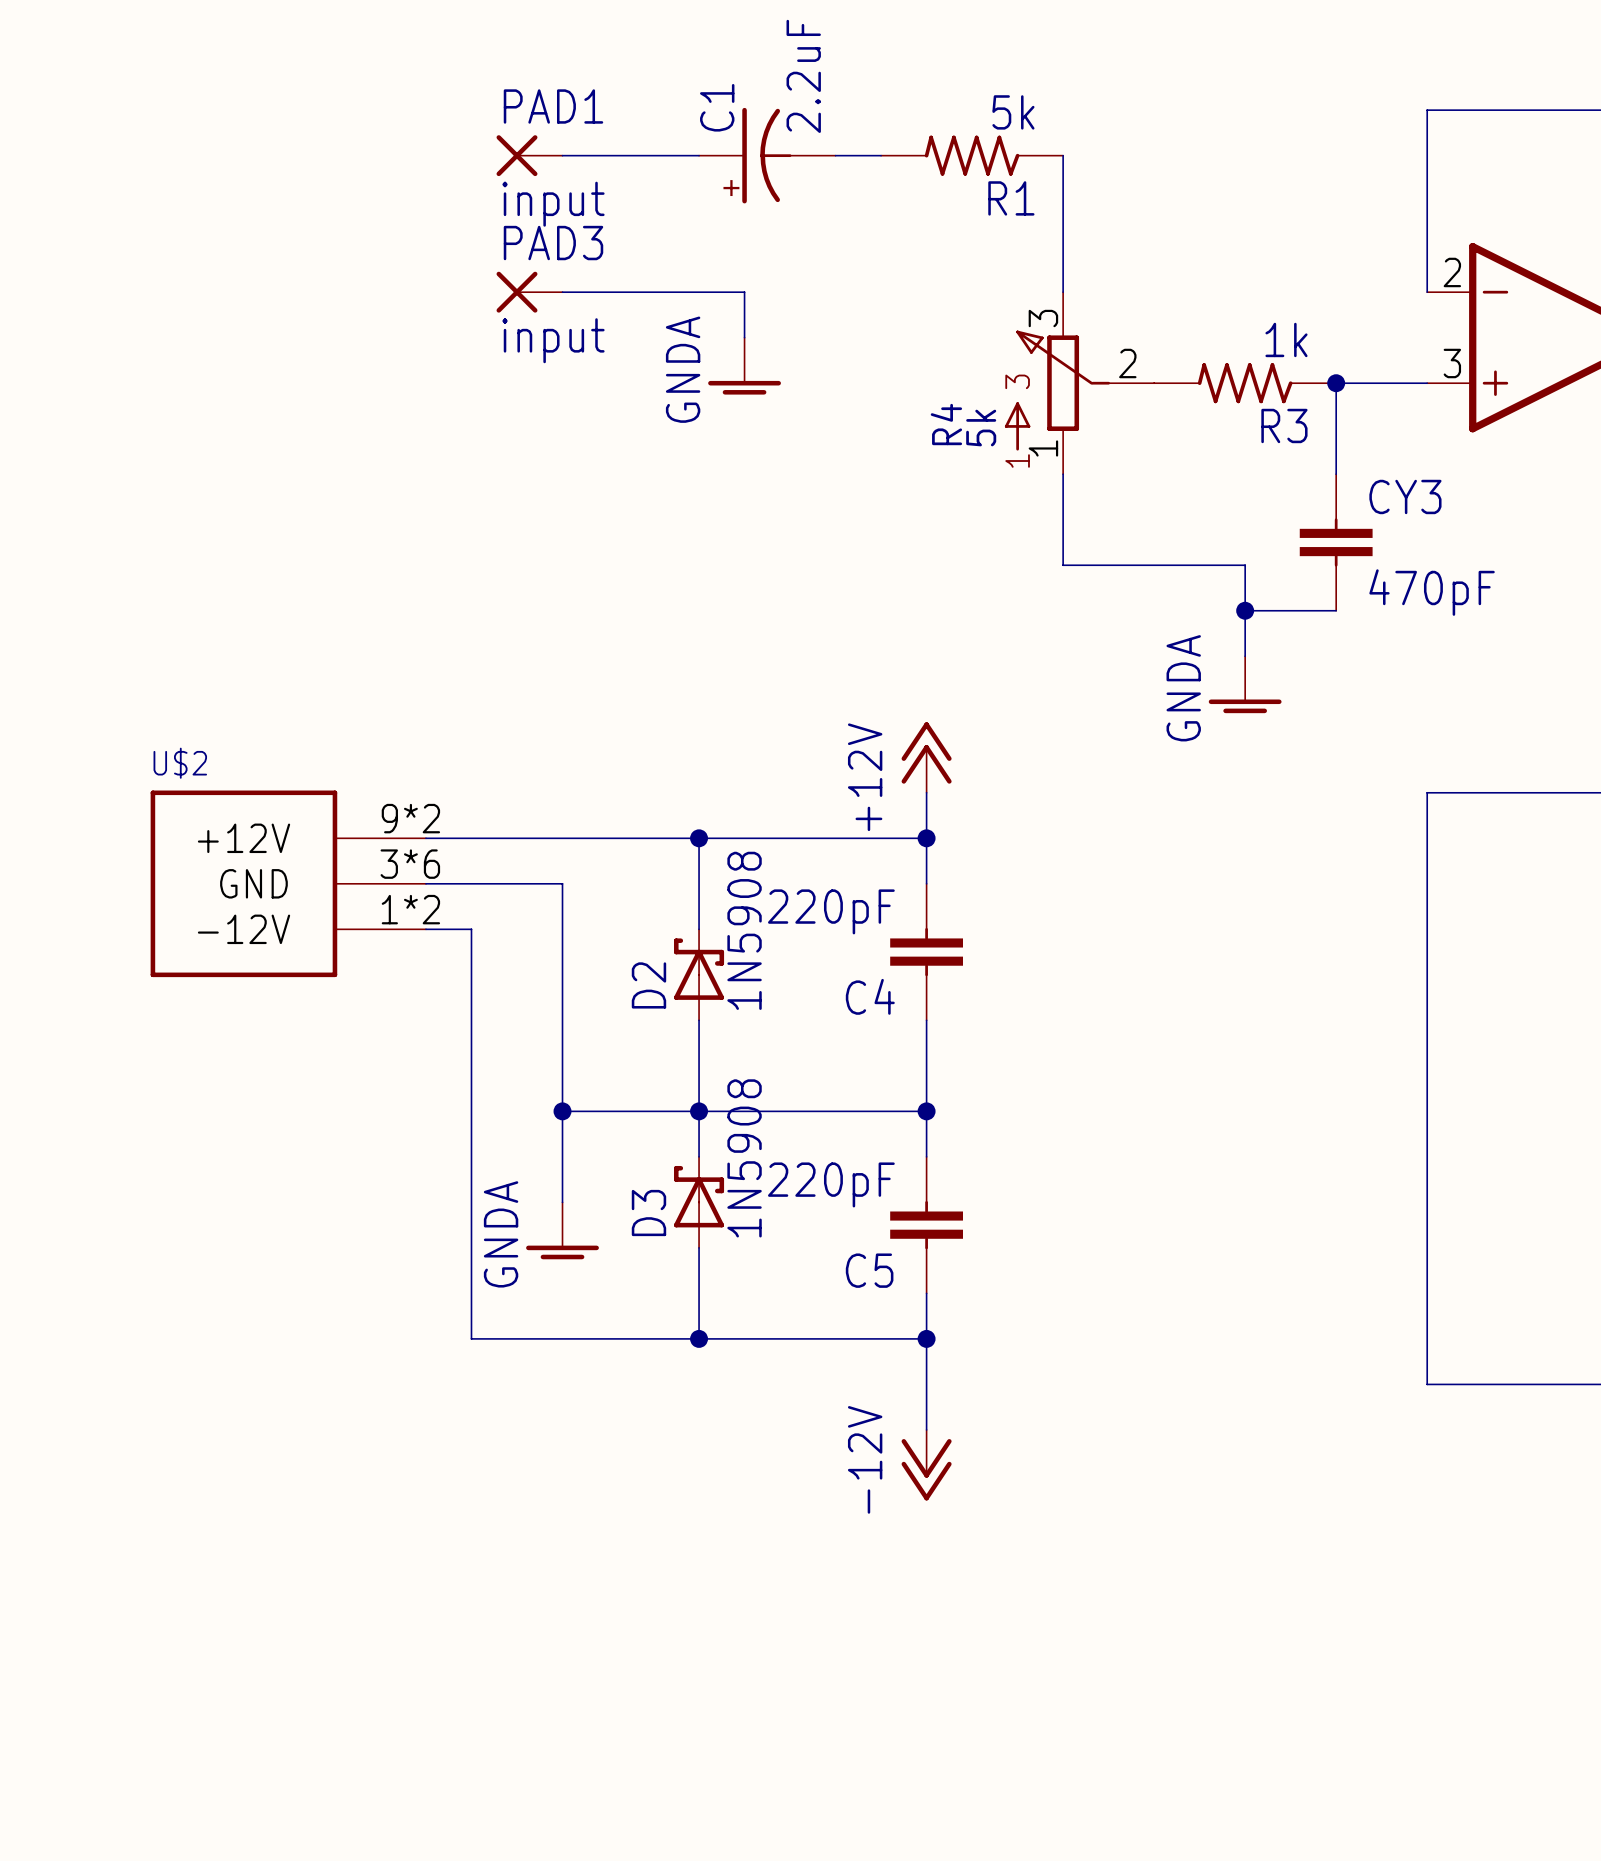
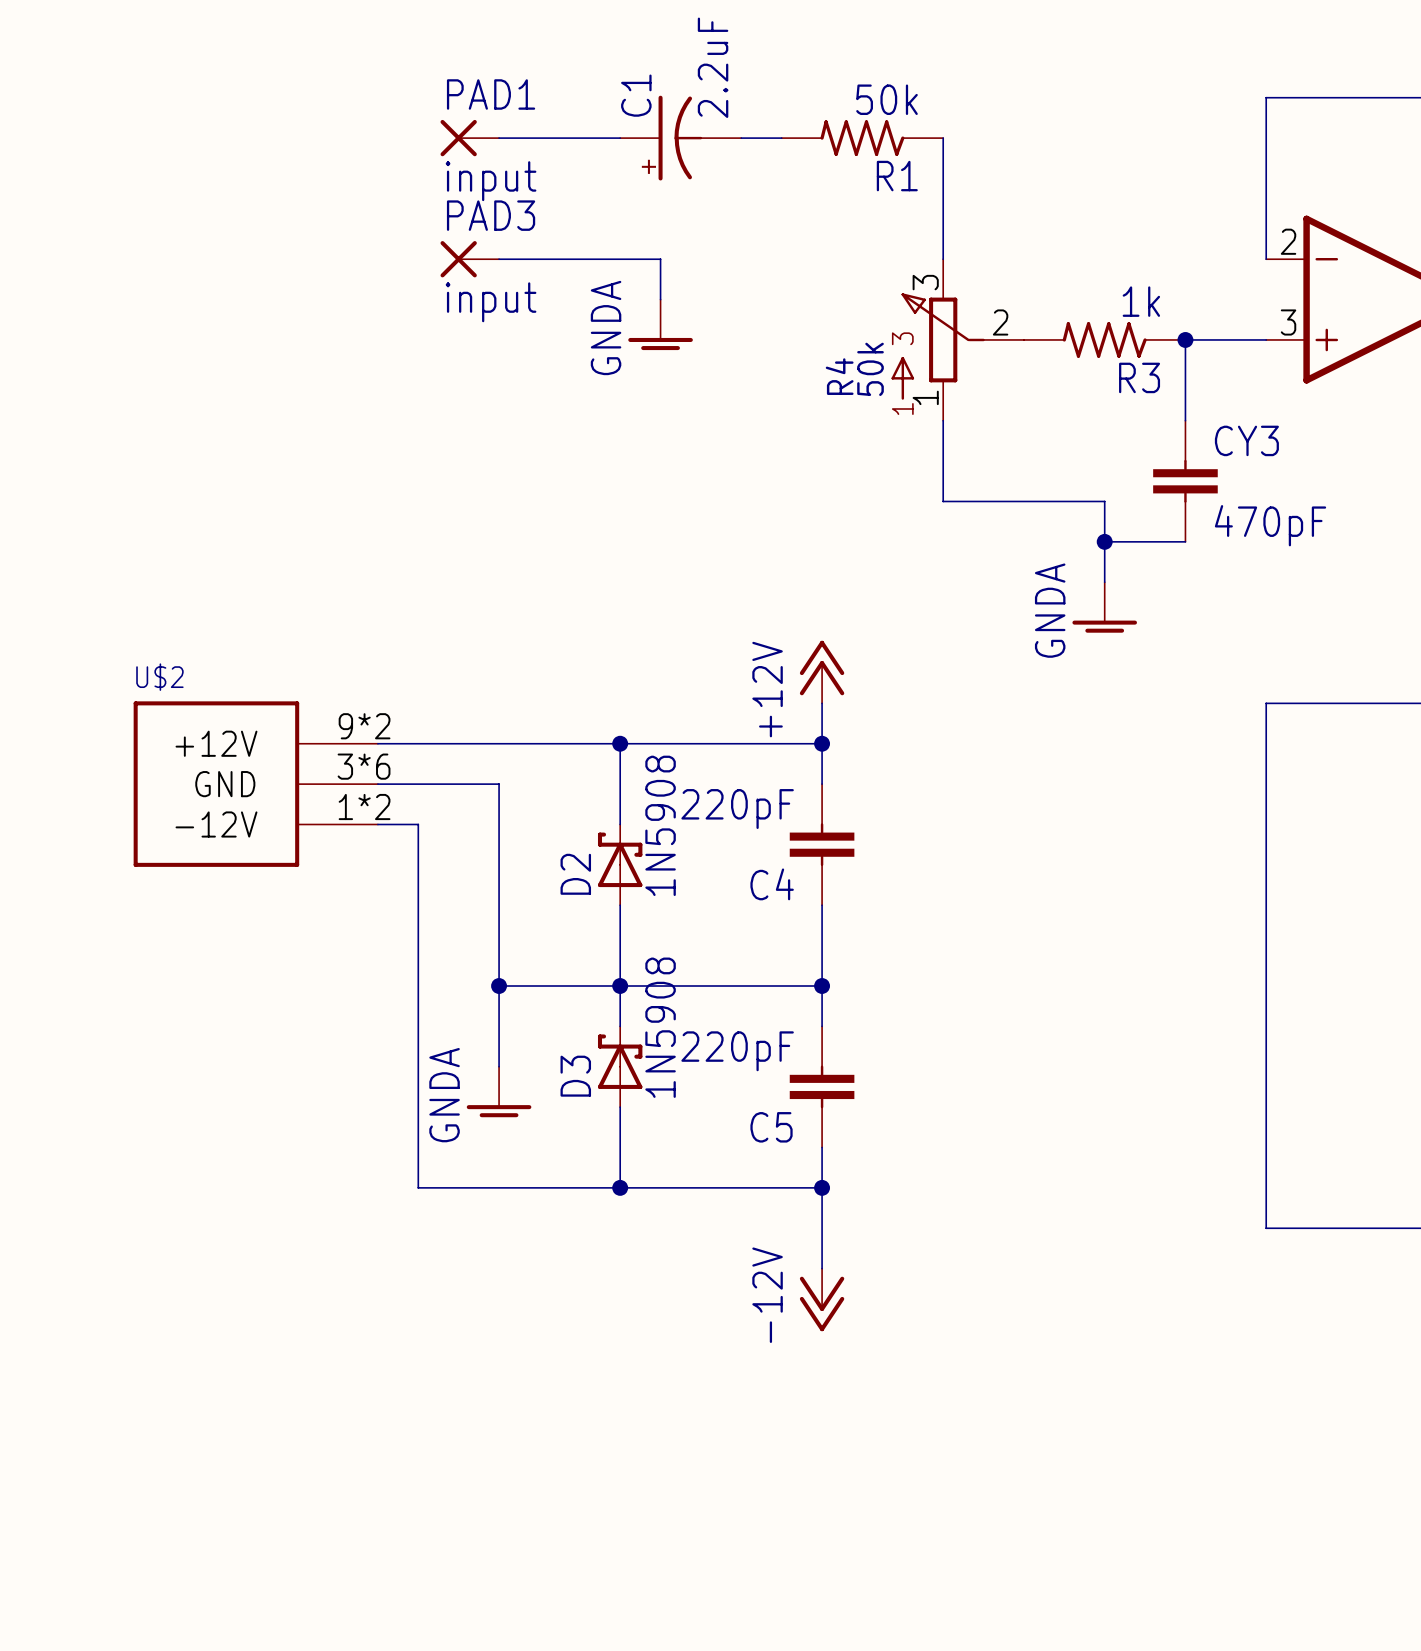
R1 value: 5k (1013, 112) -> 50k (886, 99)
R4 value: 5k (981, 428) -> 50k (870, 369)

